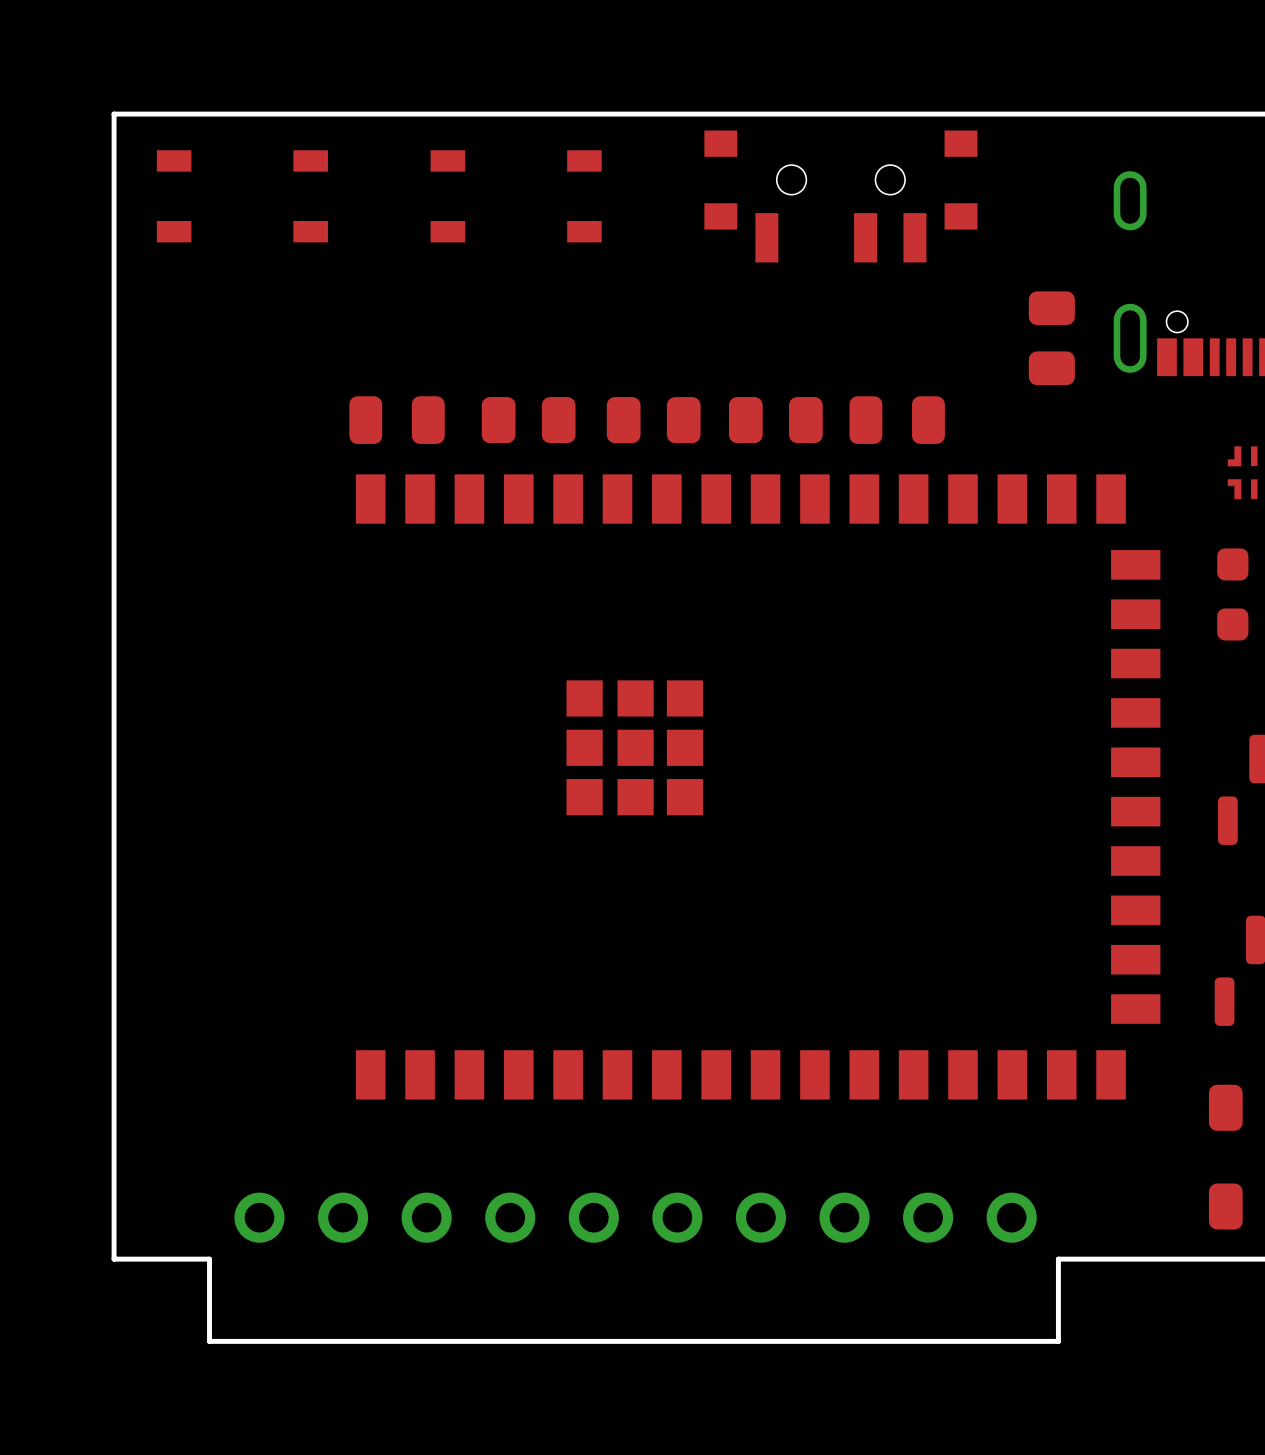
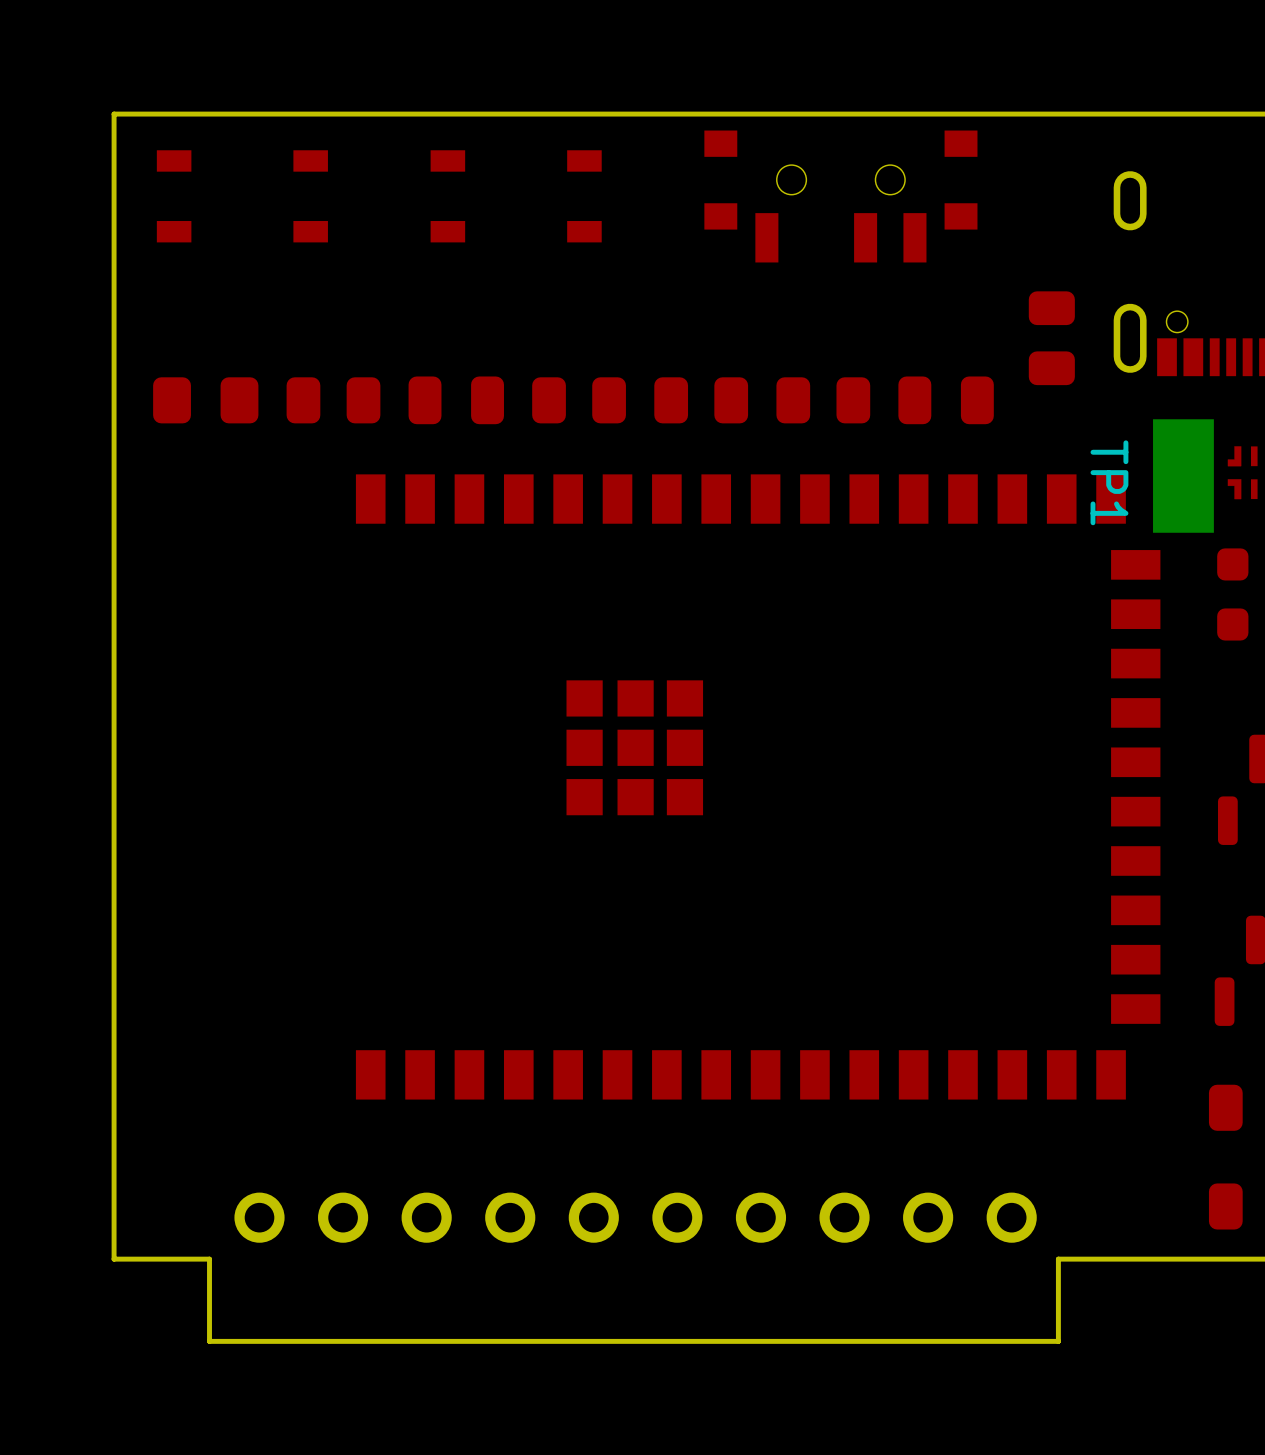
part: none -> (205, 400)
part: none -> (333, 400)
part: none -> (579, 400)
part: none -> (701, 400)
part: none -> (823, 400)
part position: (397, 420) -> (456, 400)
part: (528, 420) -> none
part: (653, 420) -> none
part: (775, 420) -> none
part position: (897, 420) -> (946, 400)
TP1: none -> (1183, 476)

